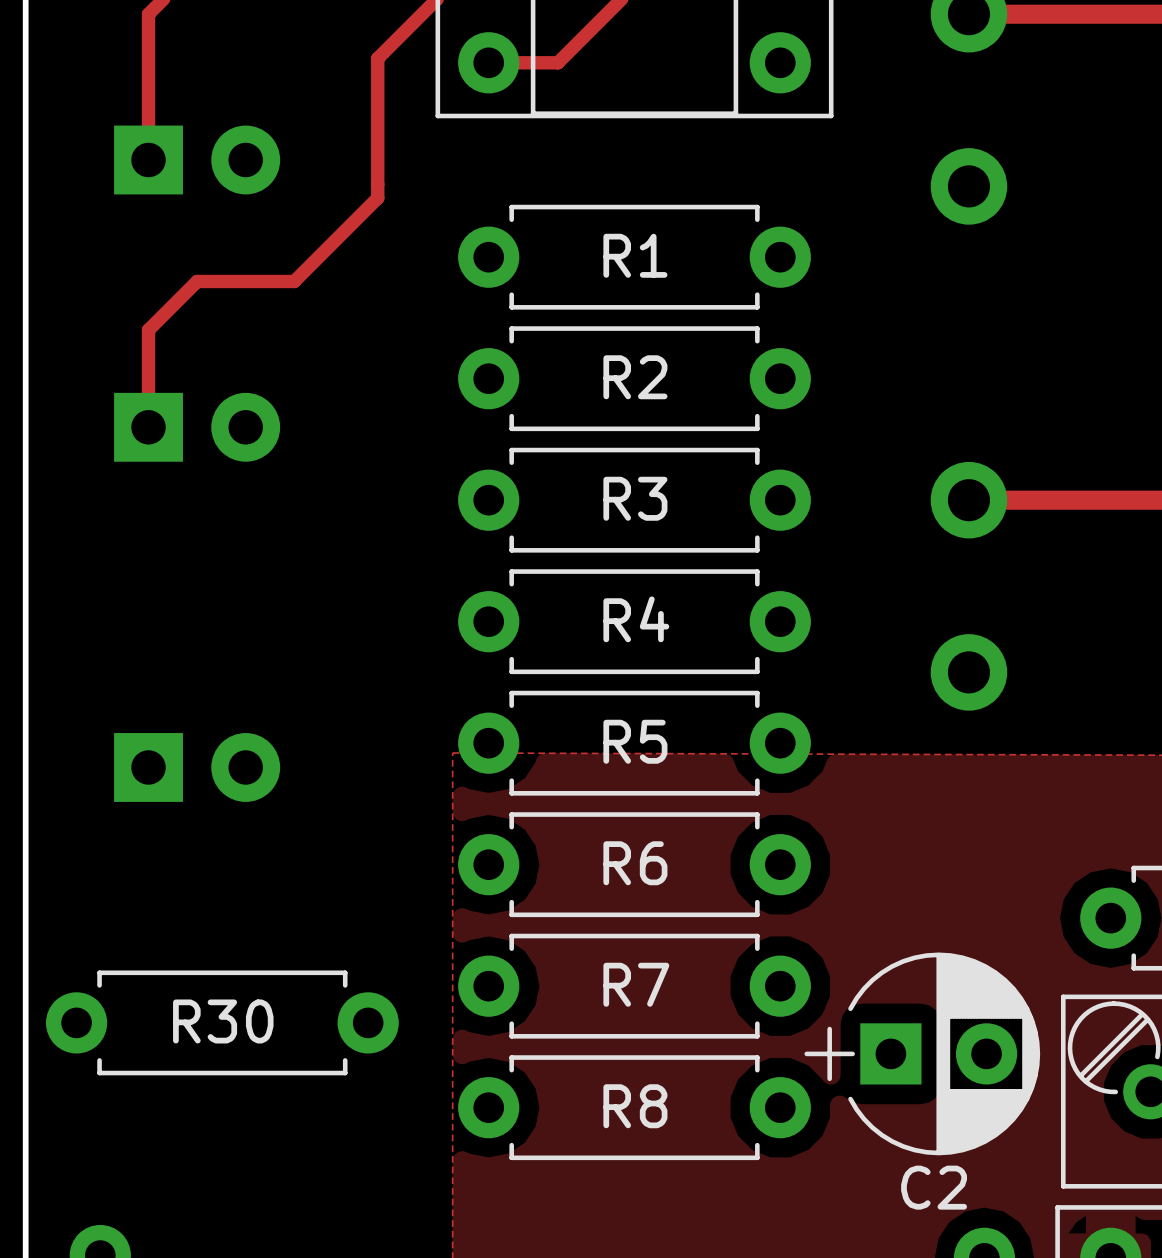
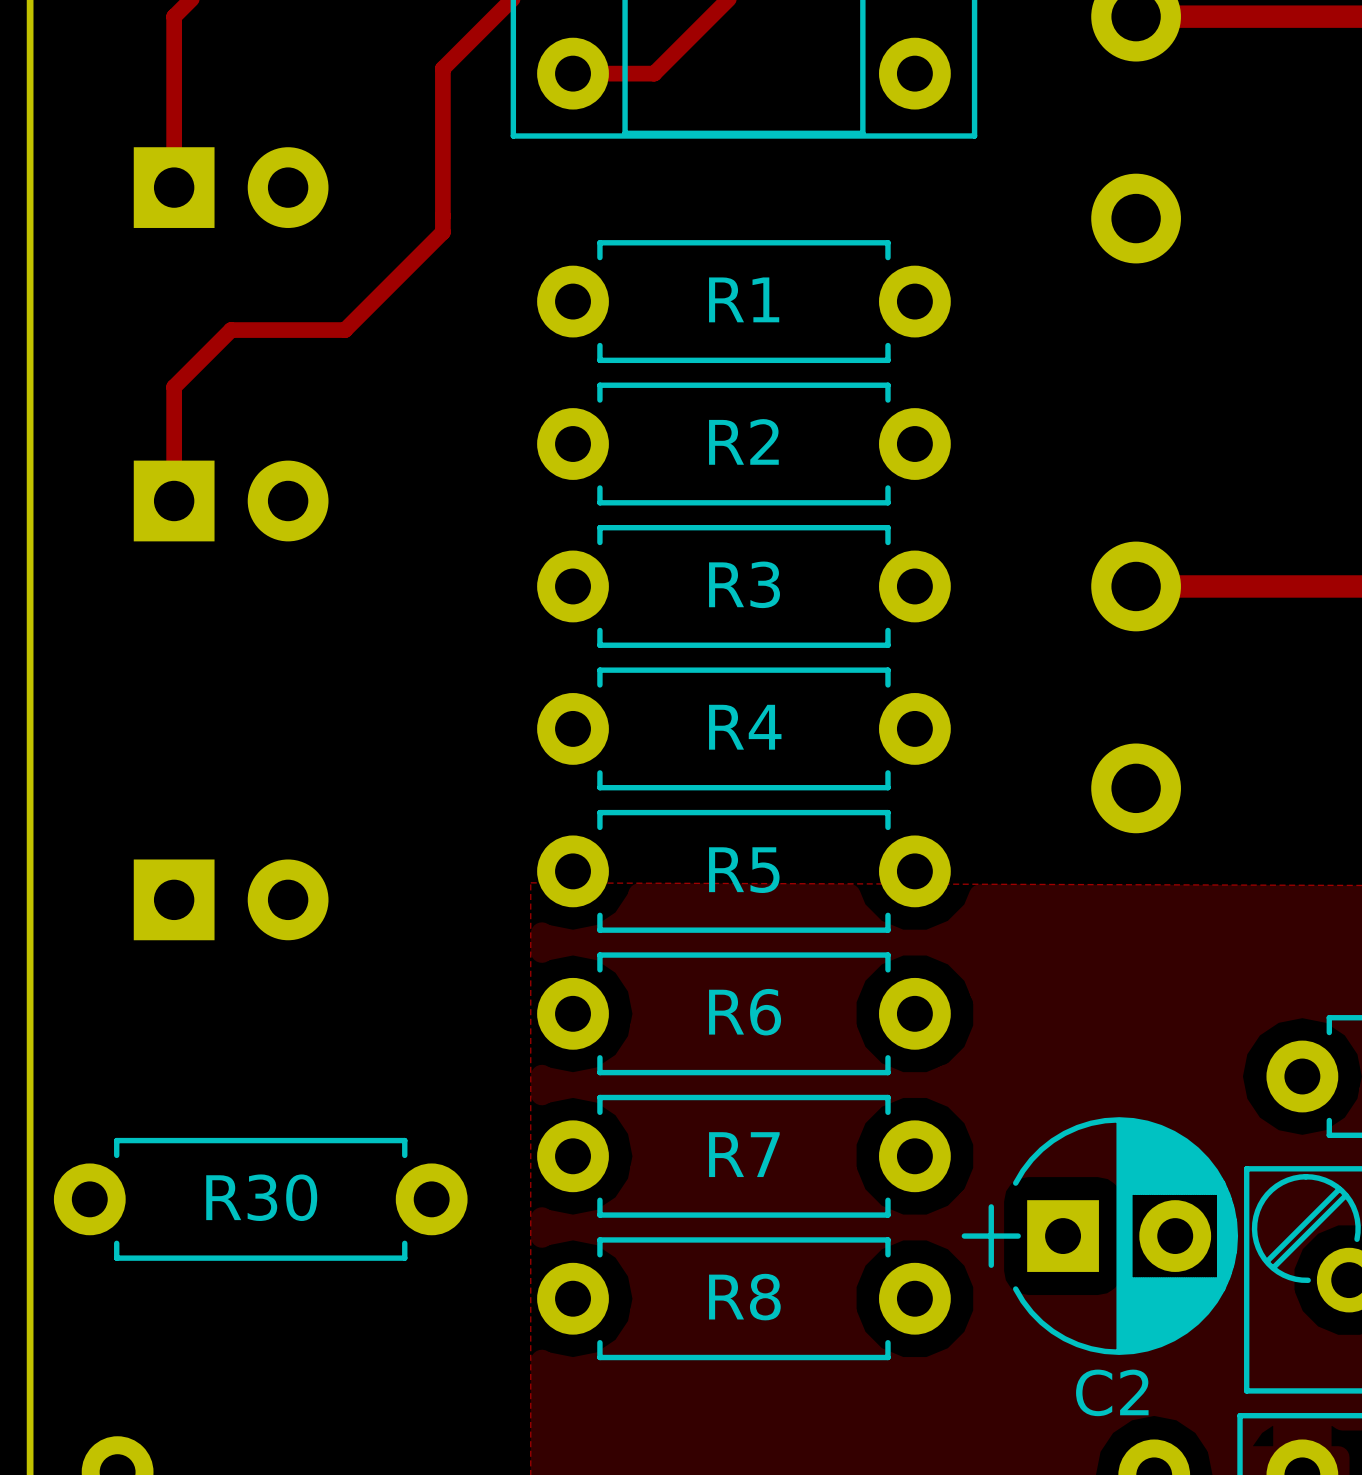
C2 position: (922, 1053) -> (1099, 1236)

